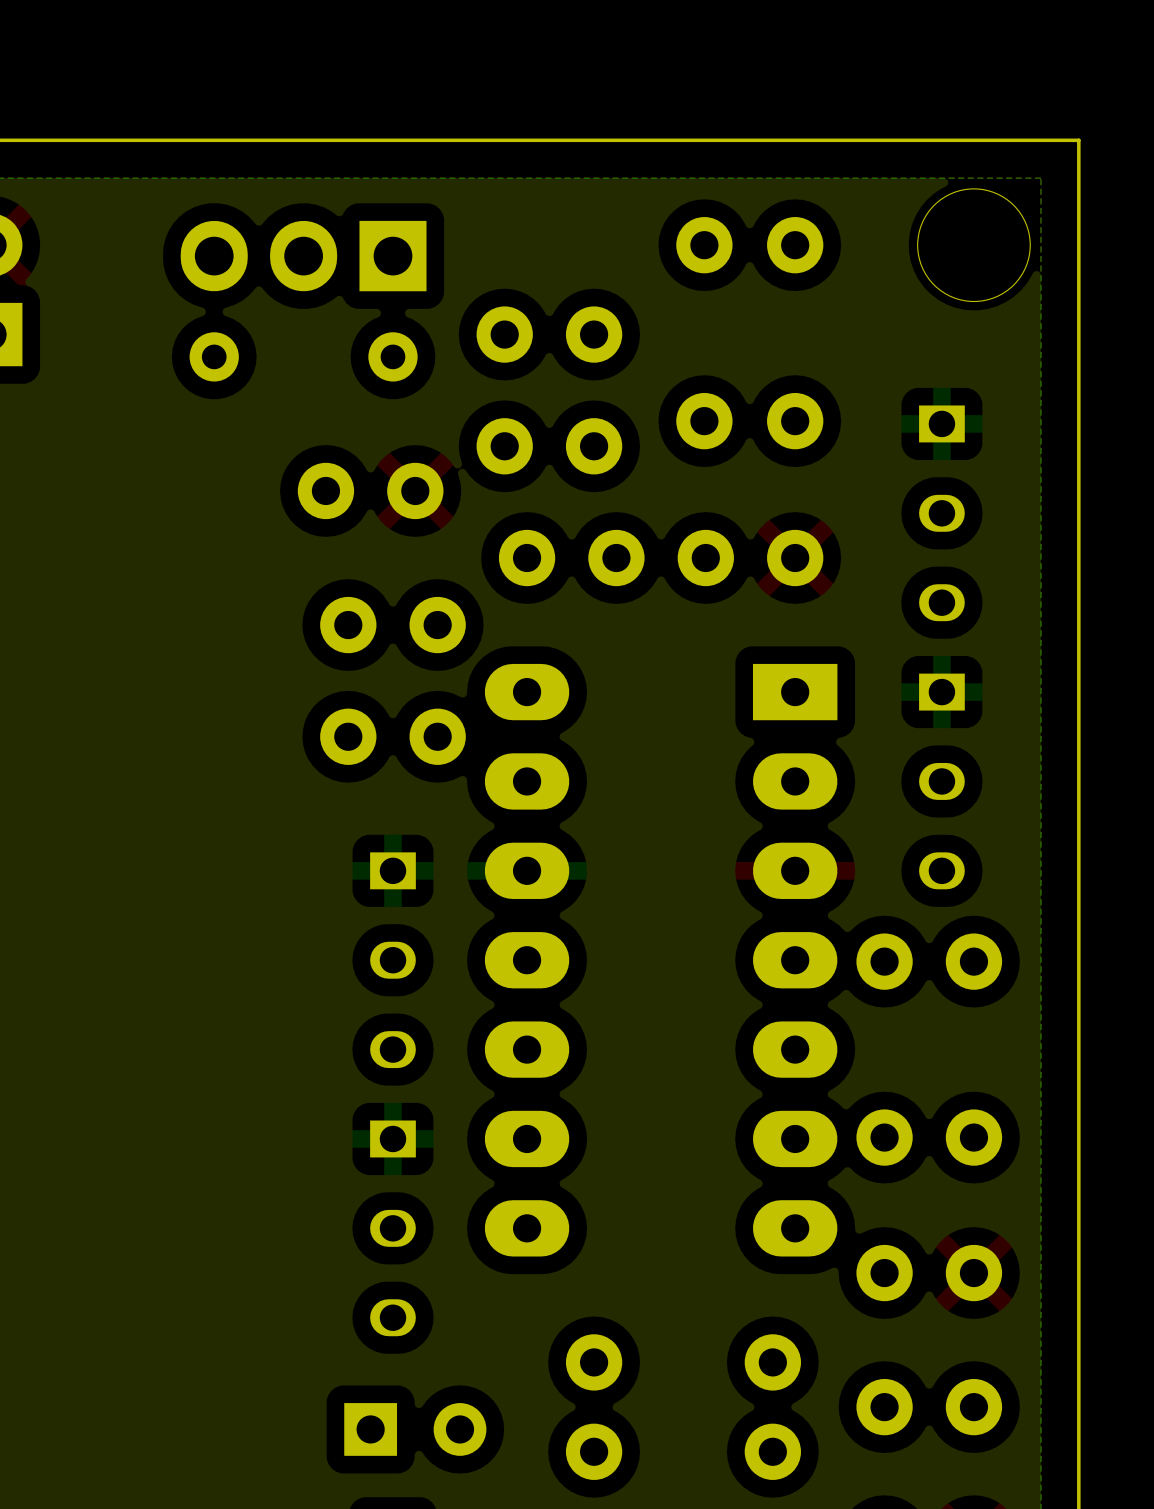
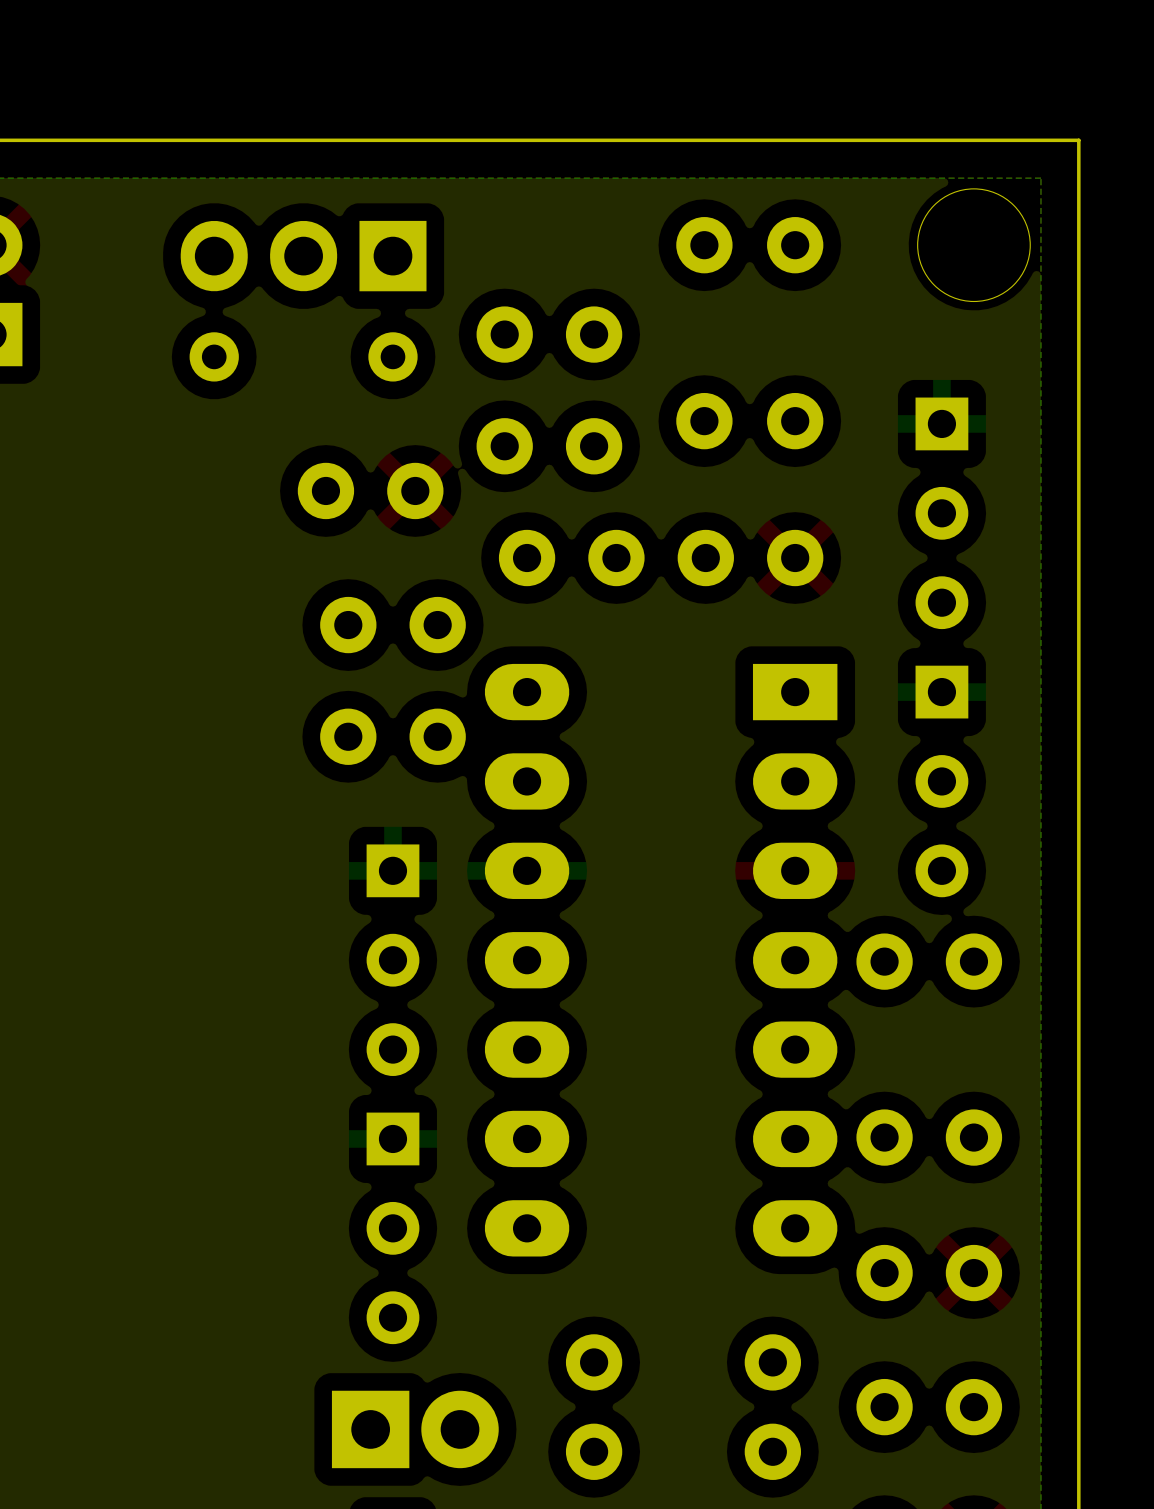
part footprint: [919, 405, 965, 622] -> [915, 397, 969, 630]
part footprint: [919, 673, 965, 890] -> [915, 665, 969, 898]
part footprint: [370, 852, 416, 1069] -> [366, 844, 420, 1076]
part footprint: [370, 1120, 416, 1337] -> [366, 1112, 420, 1345]
part footprint: [344, 1403, 487, 1456] -> [331, 1390, 499, 1469]

